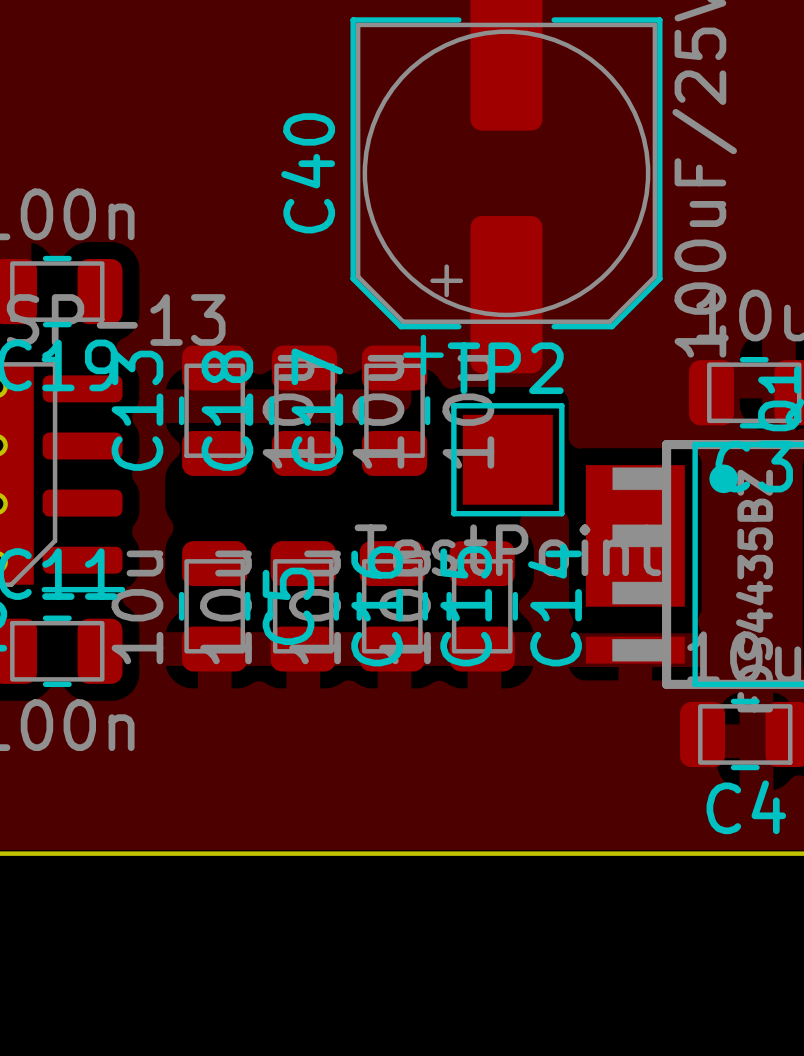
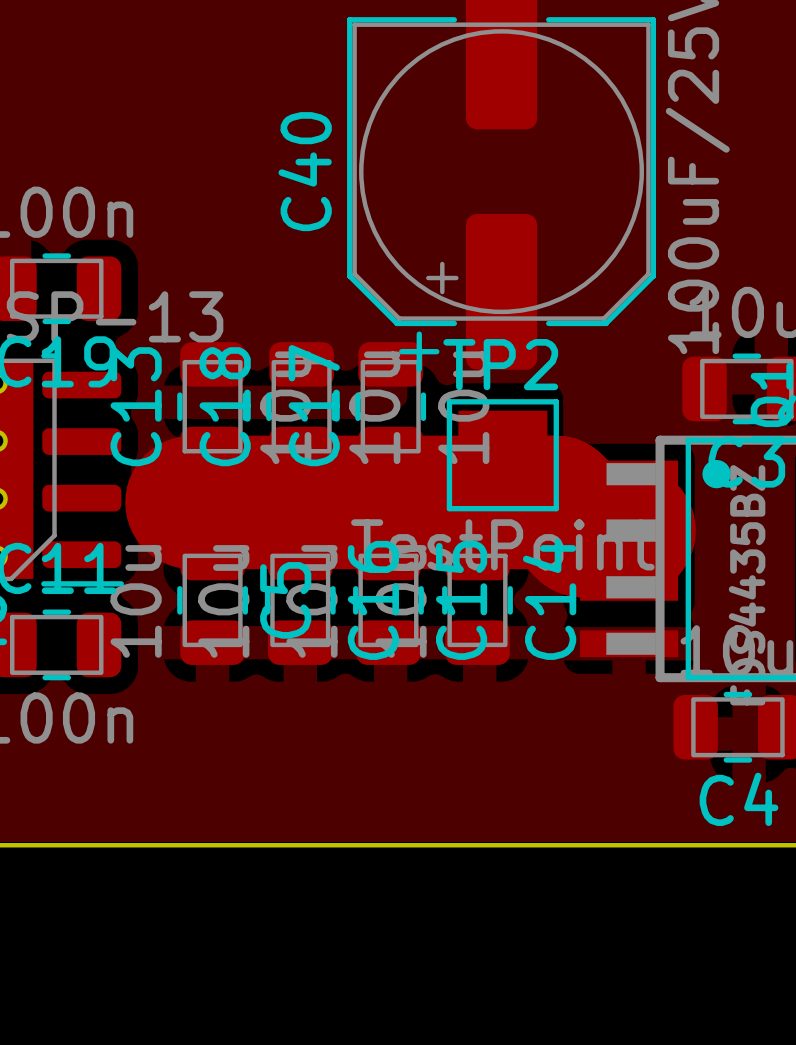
track: none -> (192, 502) (555, 502) (583, 530) (629, 530)

